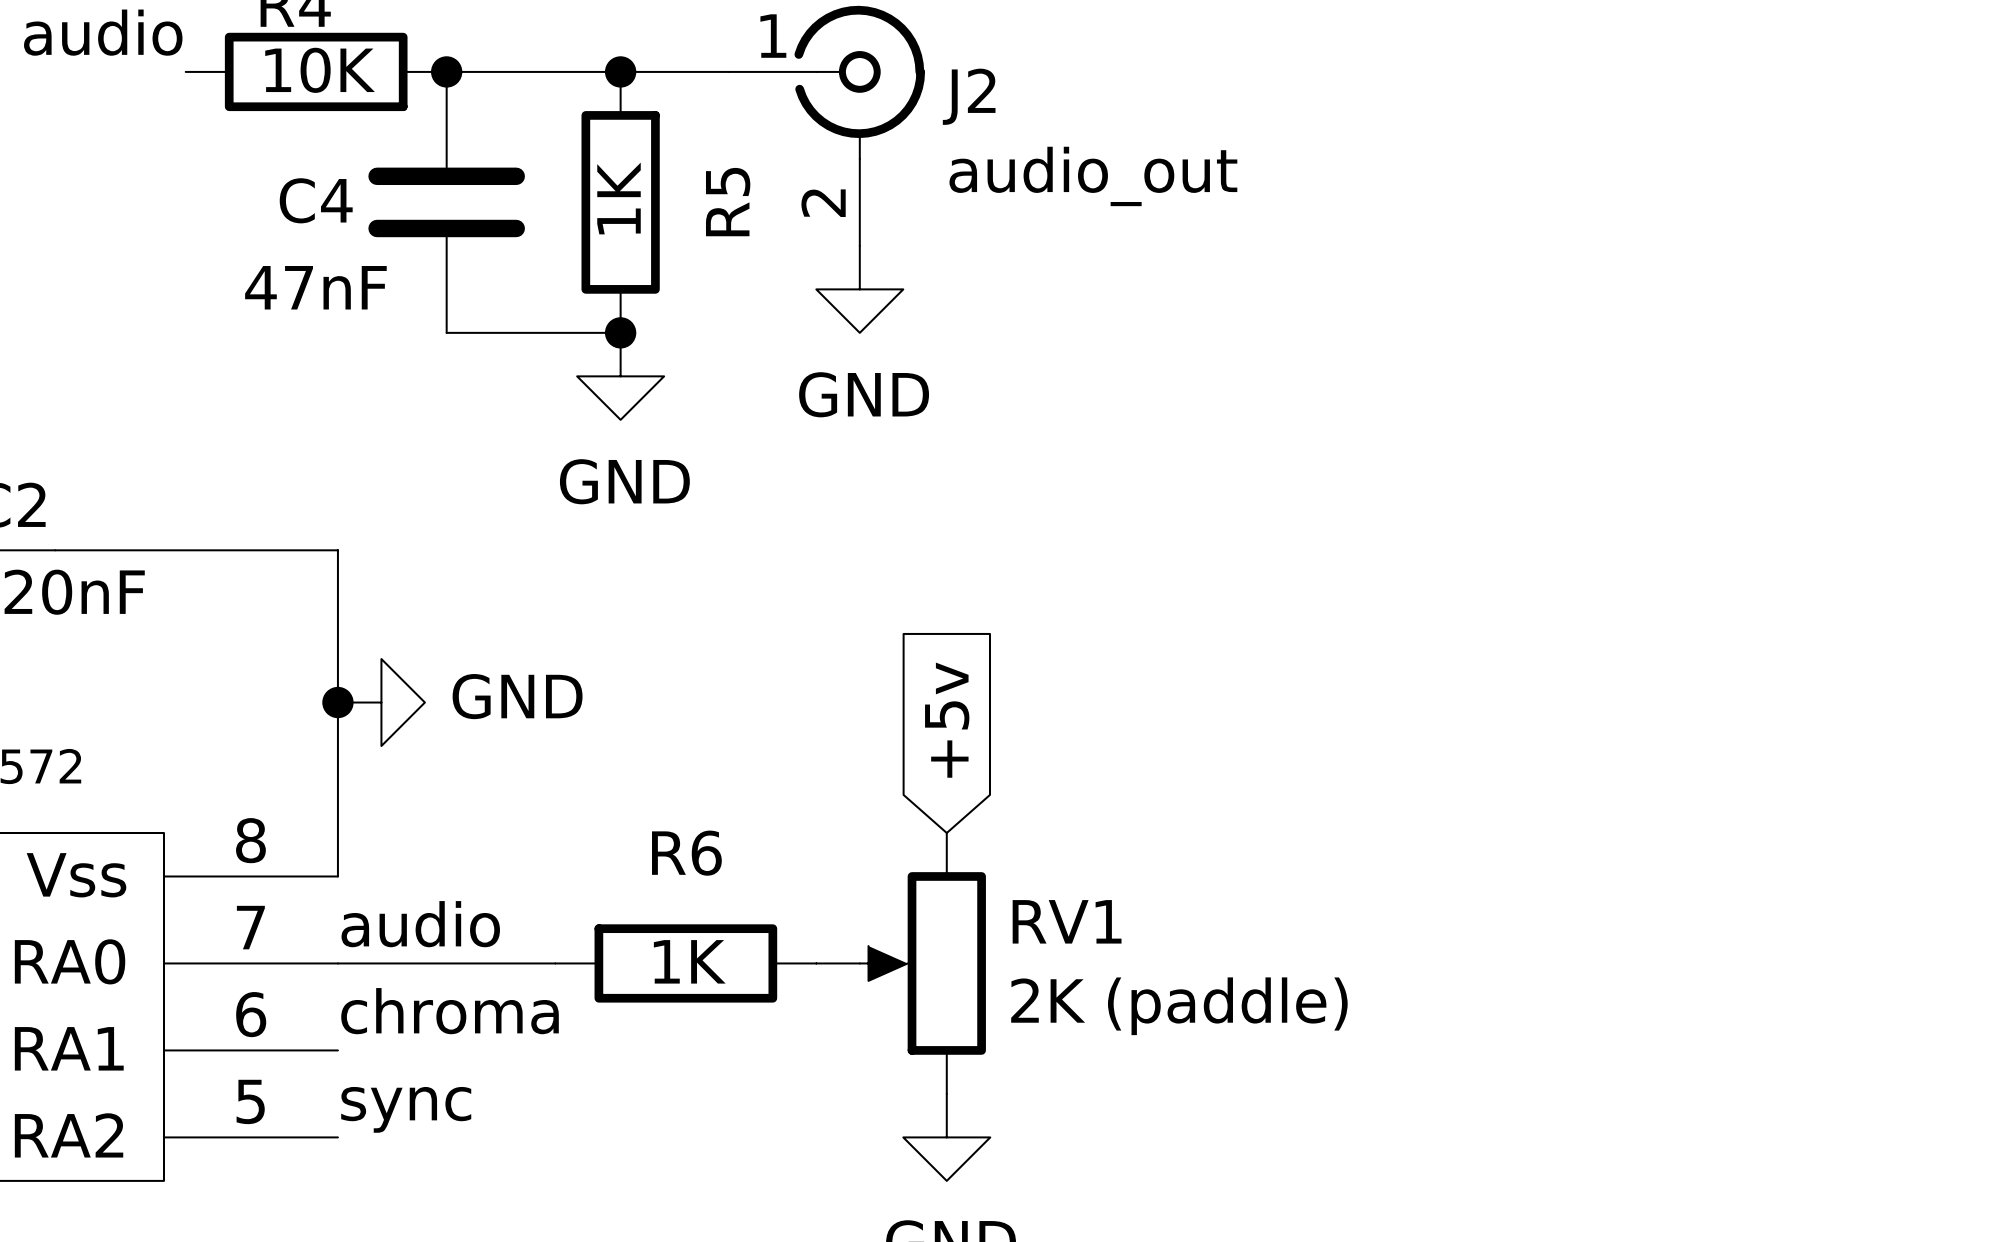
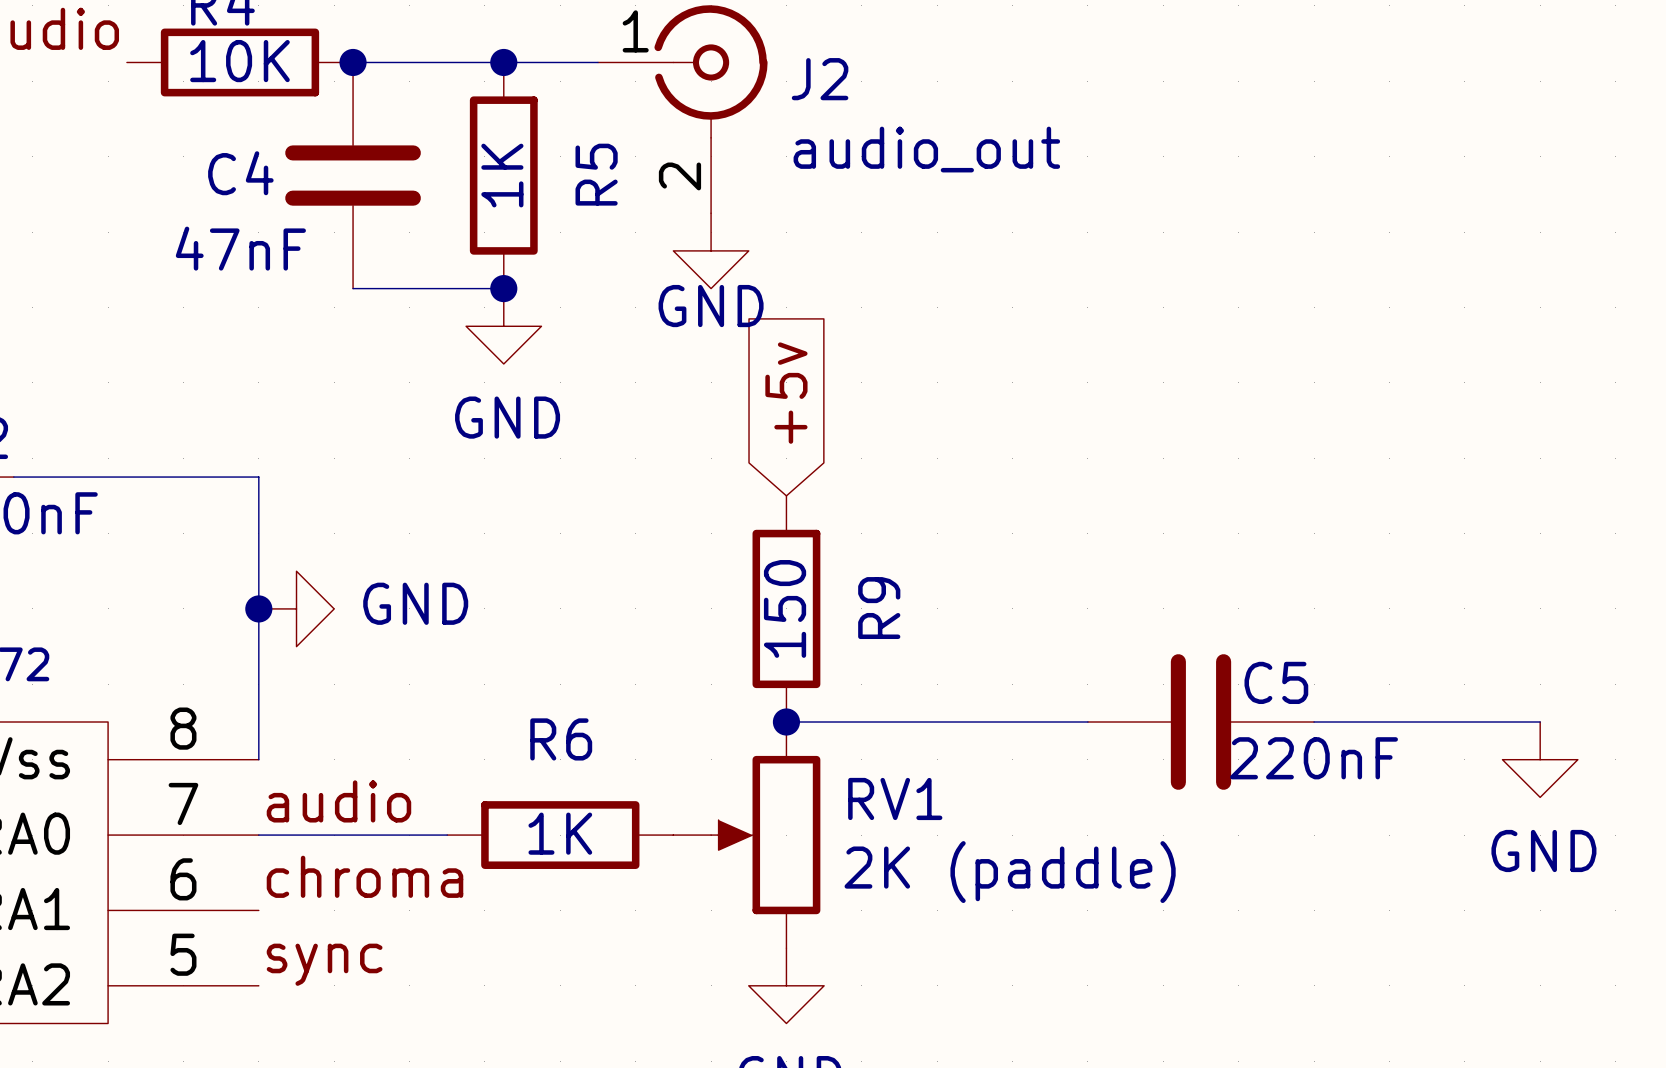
power symbol text position: GND (864, 394) -> GND (711, 306)
R9: none -> 150 (786, 608)
global label position: +5v (947, 720) -> +5v (786, 393)
wire: none -> (786, 722) (1087, 722)
junction: none -> (786, 722)
C5: none -> 220nF (1200, 722)
wire: none -> (1314, 722) (1540, 722)
power symbol: none -> GND (1540, 759)

